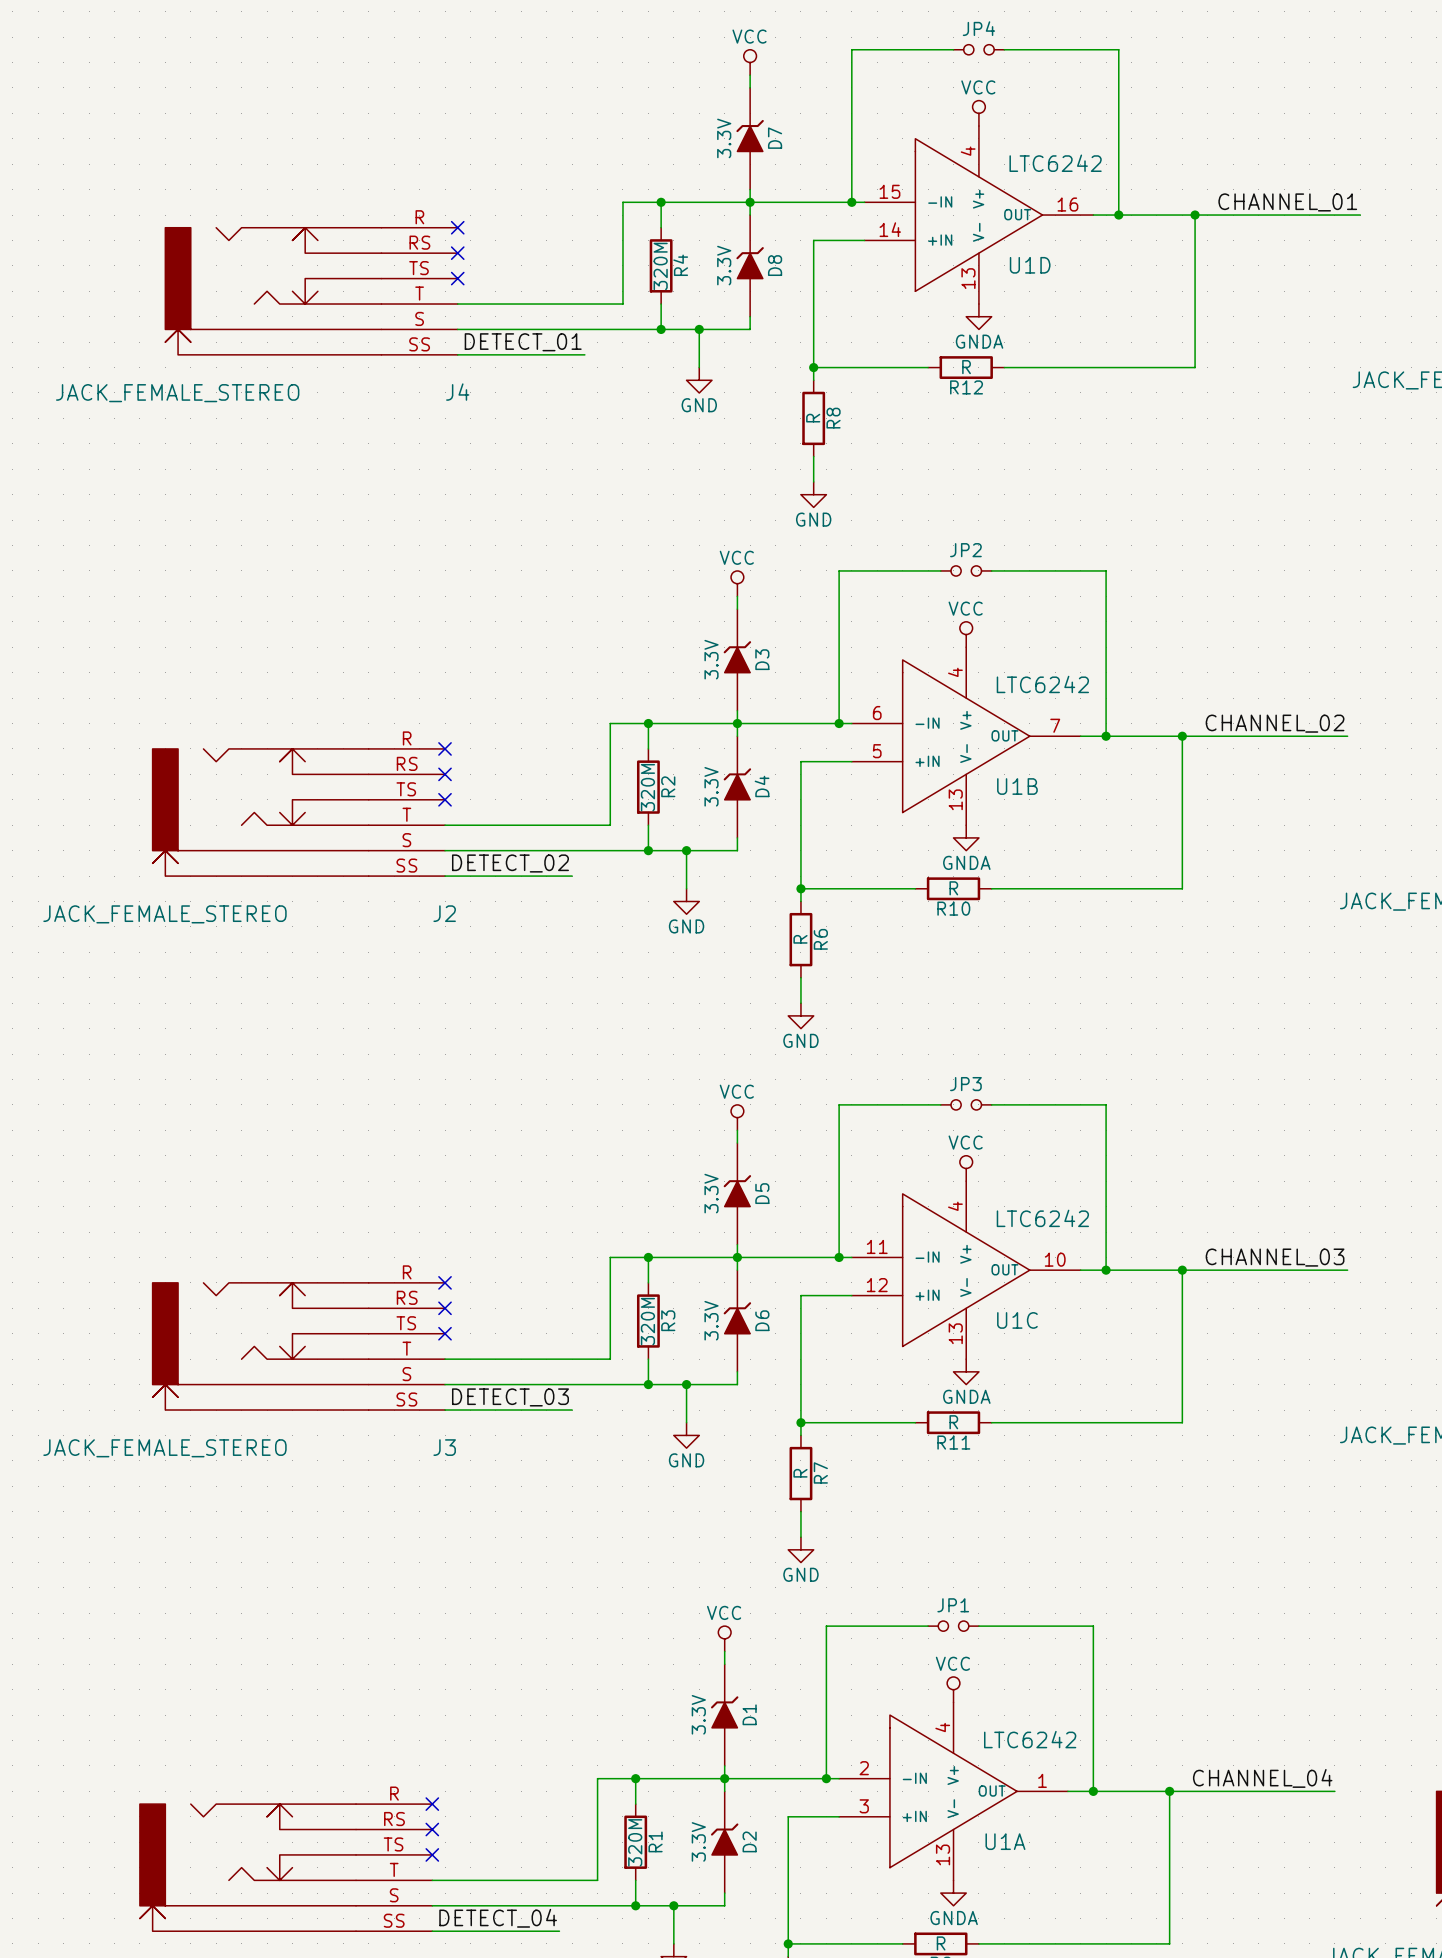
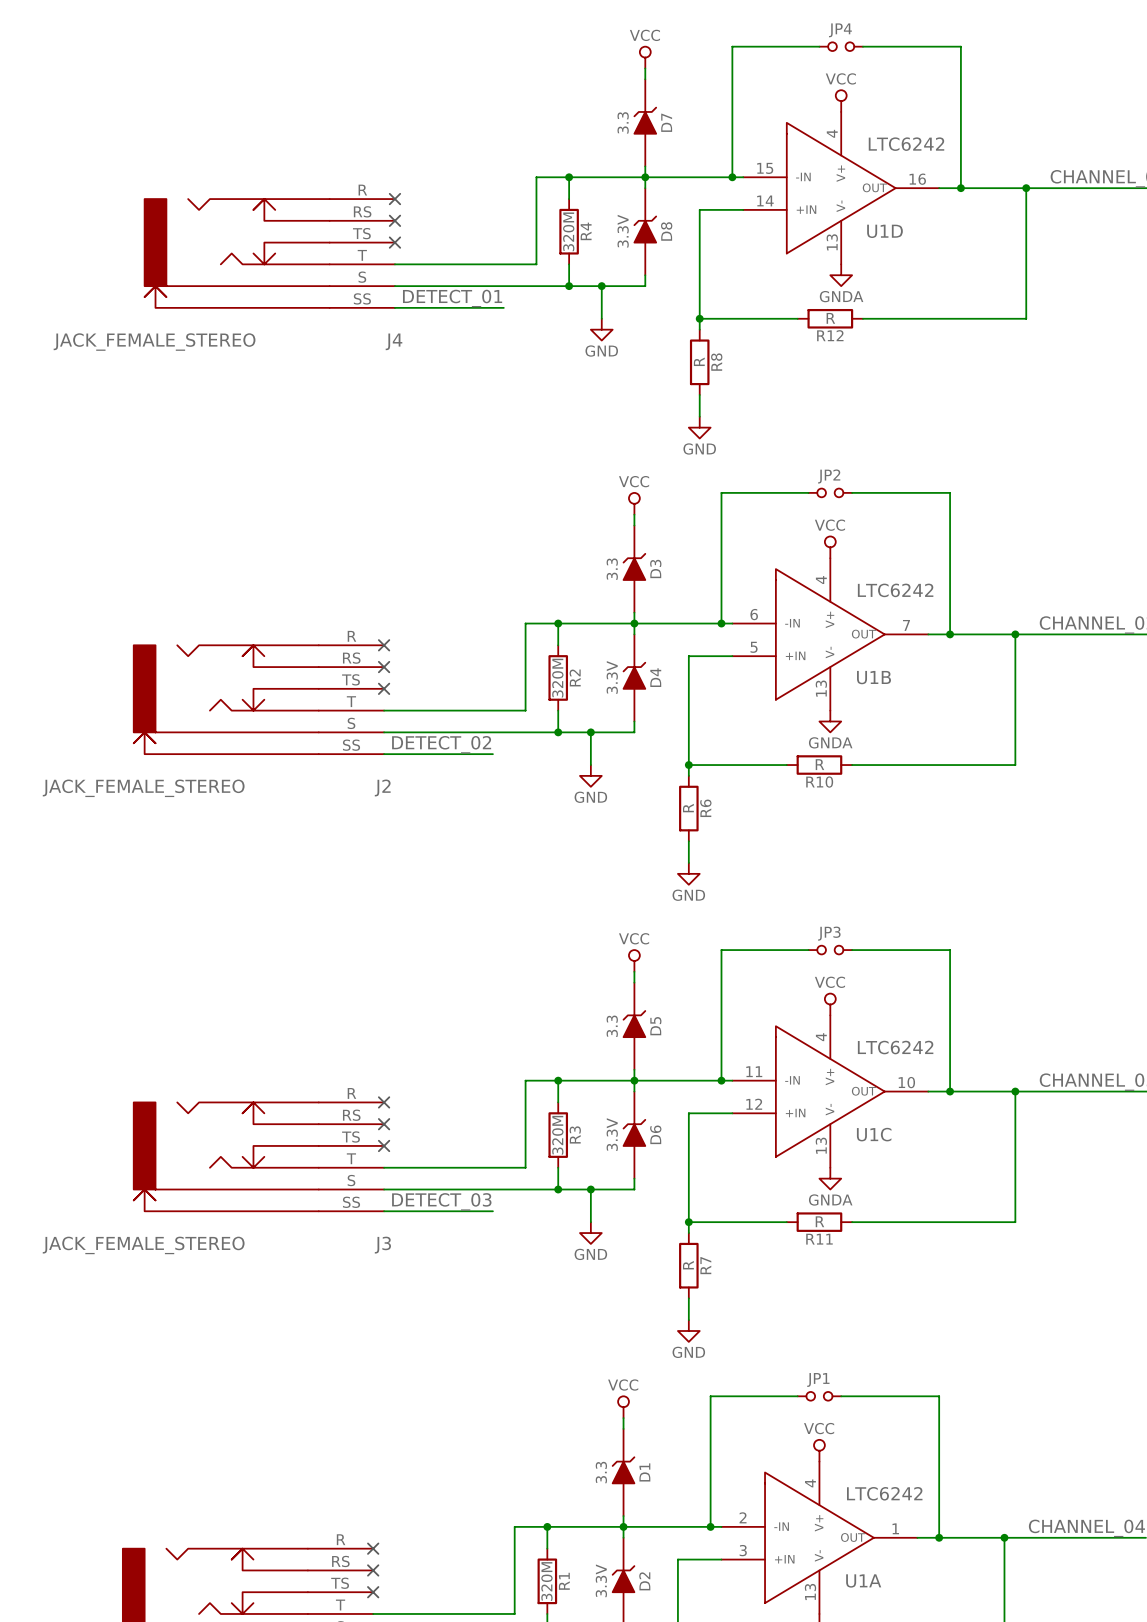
D7 value: 3.3V (724, 138) -> 3.3 (623, 122)
D3 value: 3.3V (711, 659) -> 3.3 (612, 569)
D5 value: 3.3V (711, 1193) -> 3.3 (612, 1026)
D1 value: 3.3V (698, 1714) -> 3.3 (601, 1472)

